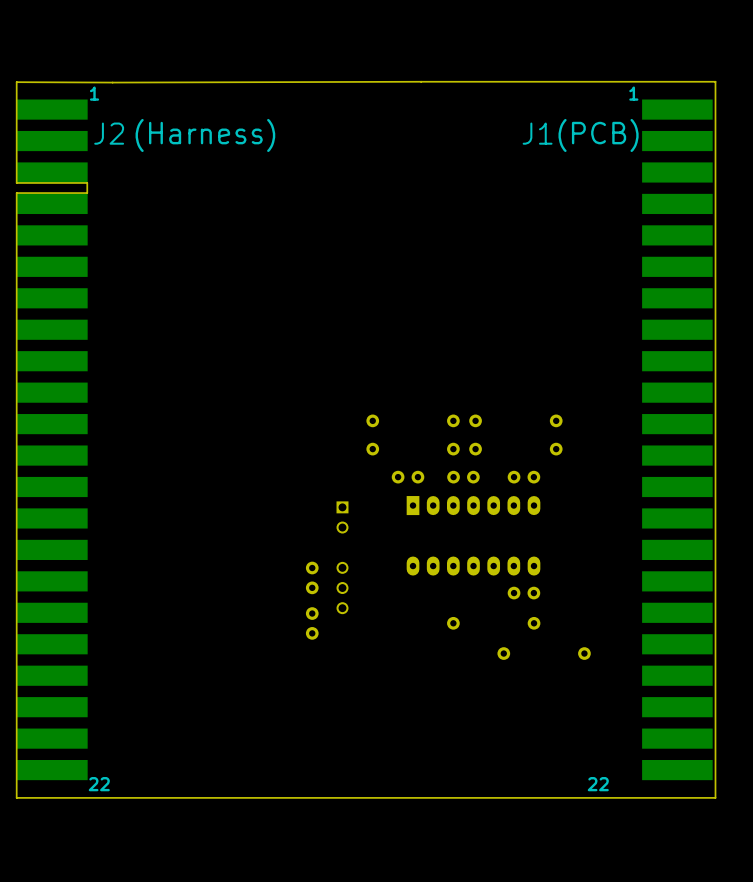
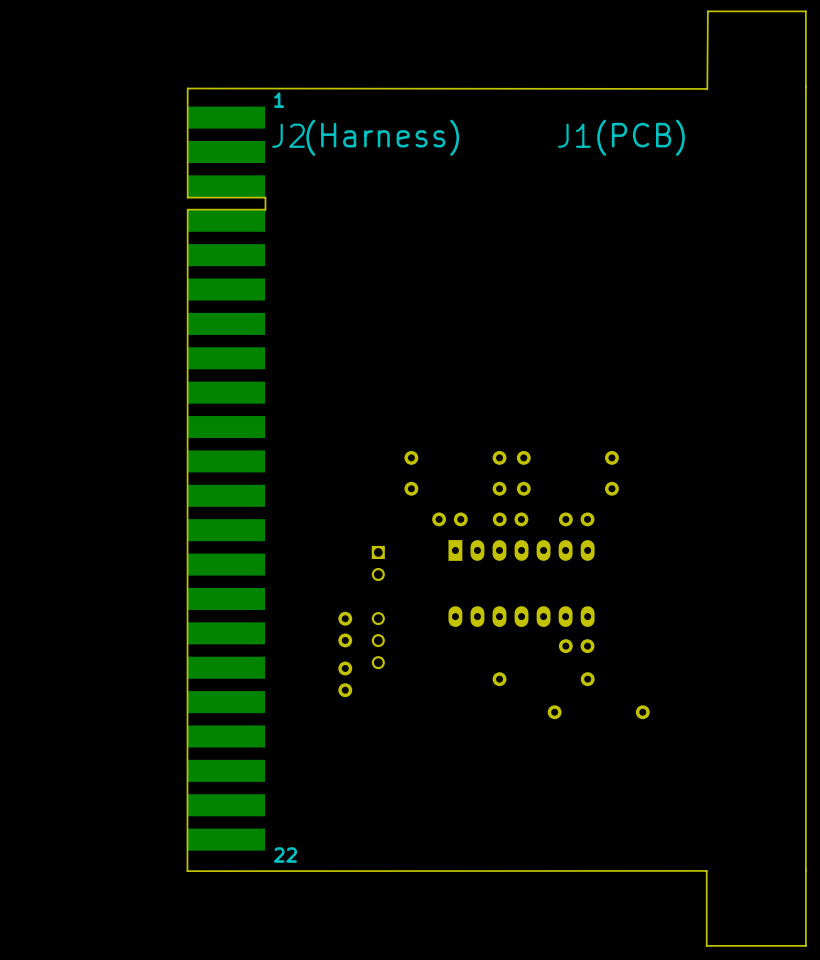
board edge: (715, 81) (715, 797) (16, 797) (16, 193) (87, 193) (87, 182) (16, 182) (16, 82) (715, 81) -> (805, 11) (805, 945) (706, 945) (706, 870) (187, 871) (187, 209) (265, 209) (265, 197) (187, 197) (187, 88) (707, 88) (707, 11) (805, 11)
text position: 1 (94, 93) -> 1 (279, 100)
text: 1 (633, 93) -> none
text position: J2 (109, 133) -> J2 (288, 135)
text position: J1 (537, 133) -> J1 (574, 135)
text position: (Harness) (205, 135) -> (Harness) (382, 137)
text position: (PCB) (598, 135) -> (PCB) (641, 137)
part position: (52, 439) -> (226, 478)
part: (677, 439) -> none
text position: 22 (99, 784) -> 22 (285, 855)
text: 22 (598, 784) -> none

